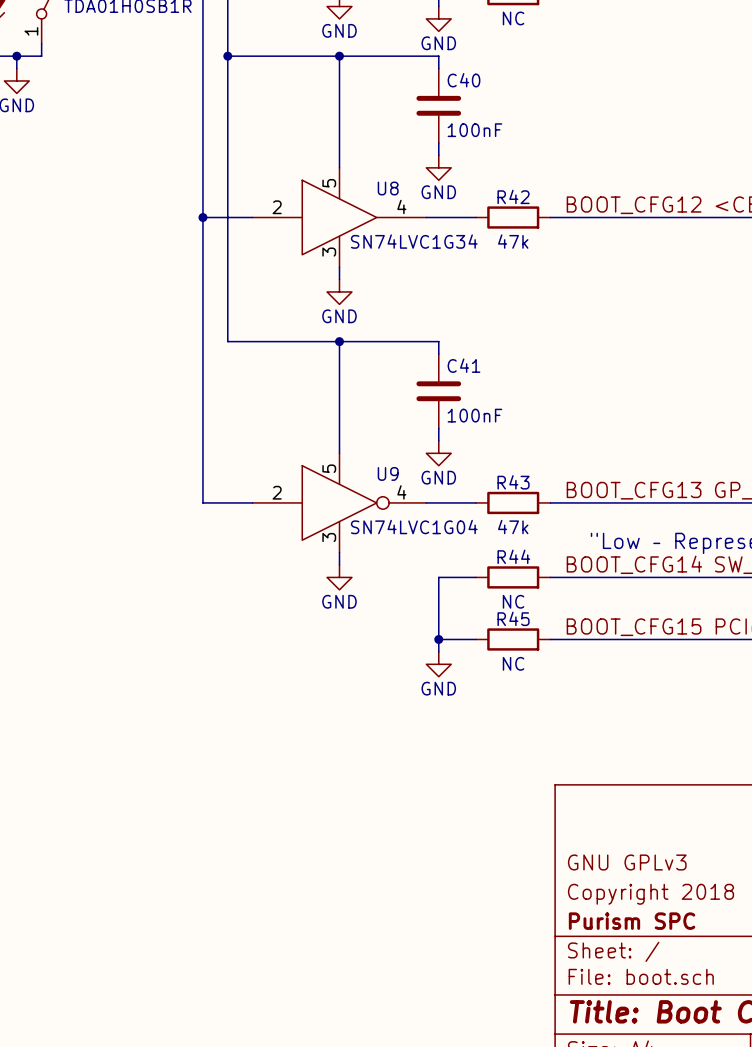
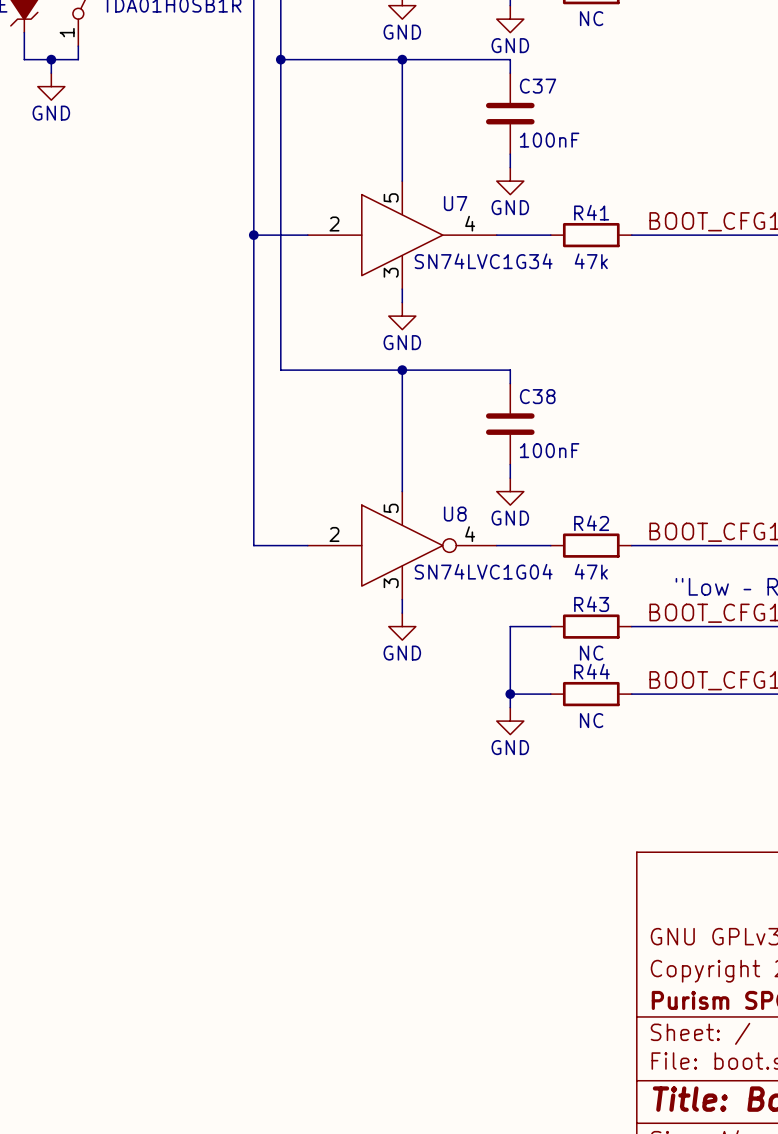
C40 name: C40 (463, 80) -> C37 (538, 86)
U8 name: U8 (388, 188) -> U7 (455, 203)
R42 name: R42 (513, 196) -> R41 (591, 212)
C41 name: C41 (463, 365) -> C38 (537, 396)
U9 name: U9 (388, 473) -> U8 (455, 514)
R43 name: R43 (513, 482) -> R42 (591, 523)
R44 name: R44 (513, 556) -> R43 (591, 604)
R45 name: R45 (513, 618) -> R44 (591, 671)

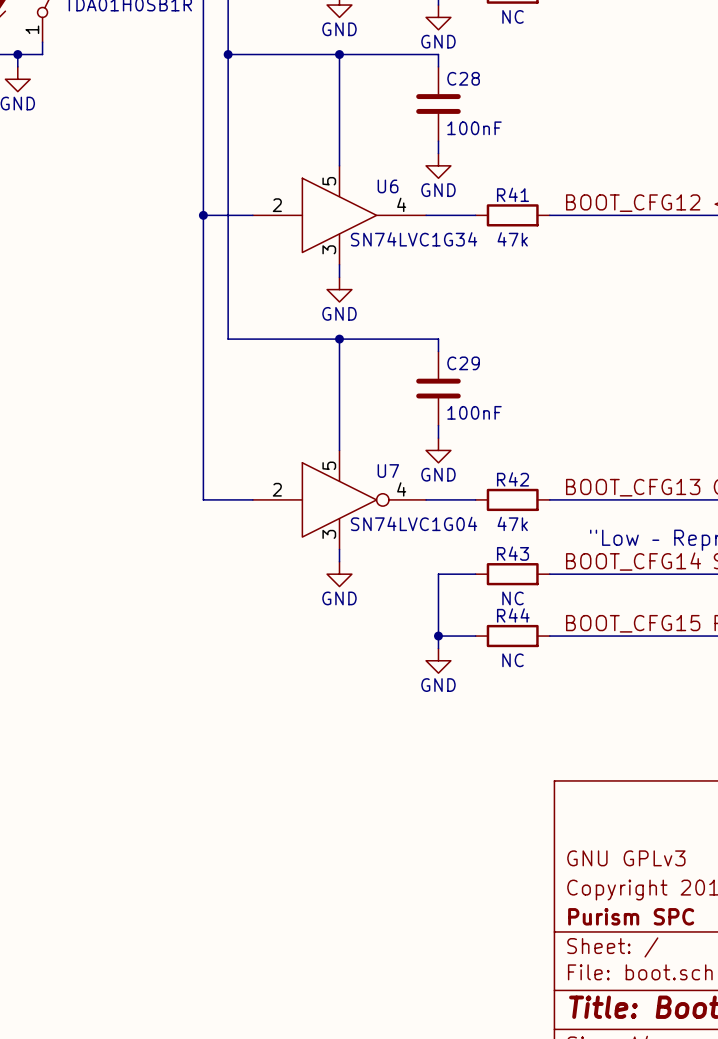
C37 name: C37 (538, 86) -> C28 (463, 78)
U7 name: U7 (455, 203) -> U6 (388, 186)
C38 name: C38 (537, 396) -> C29 (463, 363)
U8 name: U8 (455, 514) -> U7 (388, 471)

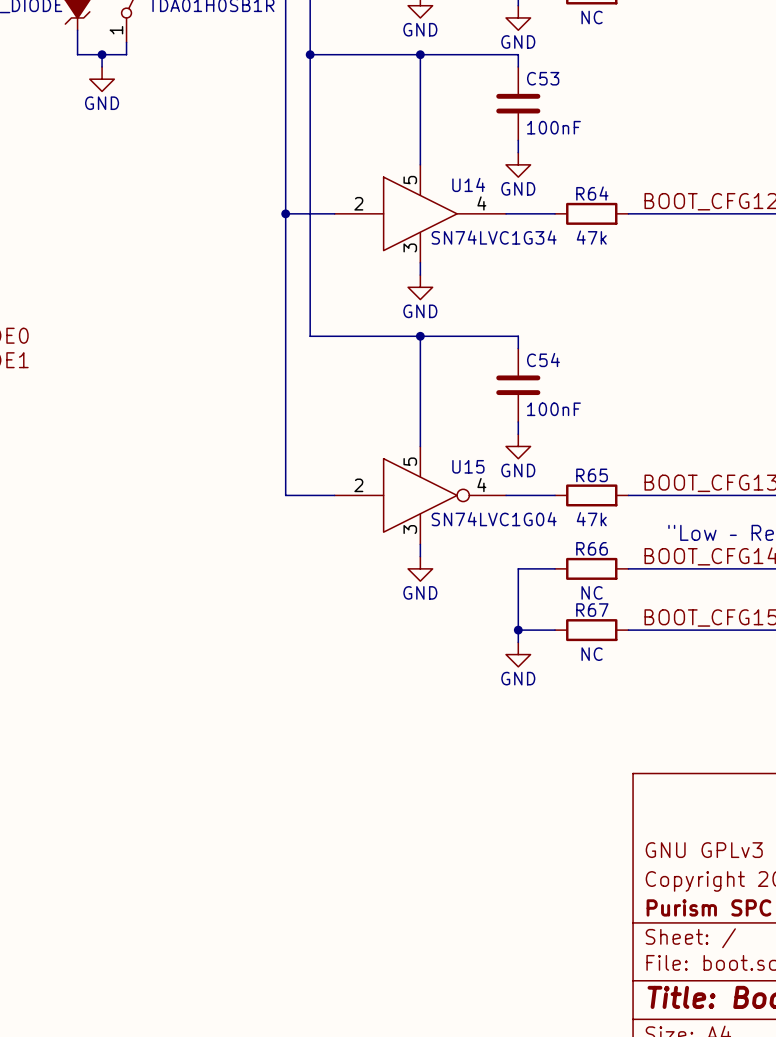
C28 name: C28 (463, 78) -> C53 (543, 78)
U6 name: U6 (388, 186) -> U14 (468, 184)
R41 name: R41 (513, 194) -> R64 (592, 193)
C29 name: C29 (463, 363) -> C54 (543, 360)
U7 name: U7 (388, 471) -> U15 (468, 466)
R42 name: R42 (513, 479) -> R65 (592, 475)
R43 name: R43 (513, 553) -> R66 (592, 548)
R44 name: R44 (513, 615) -> R67 (592, 610)

